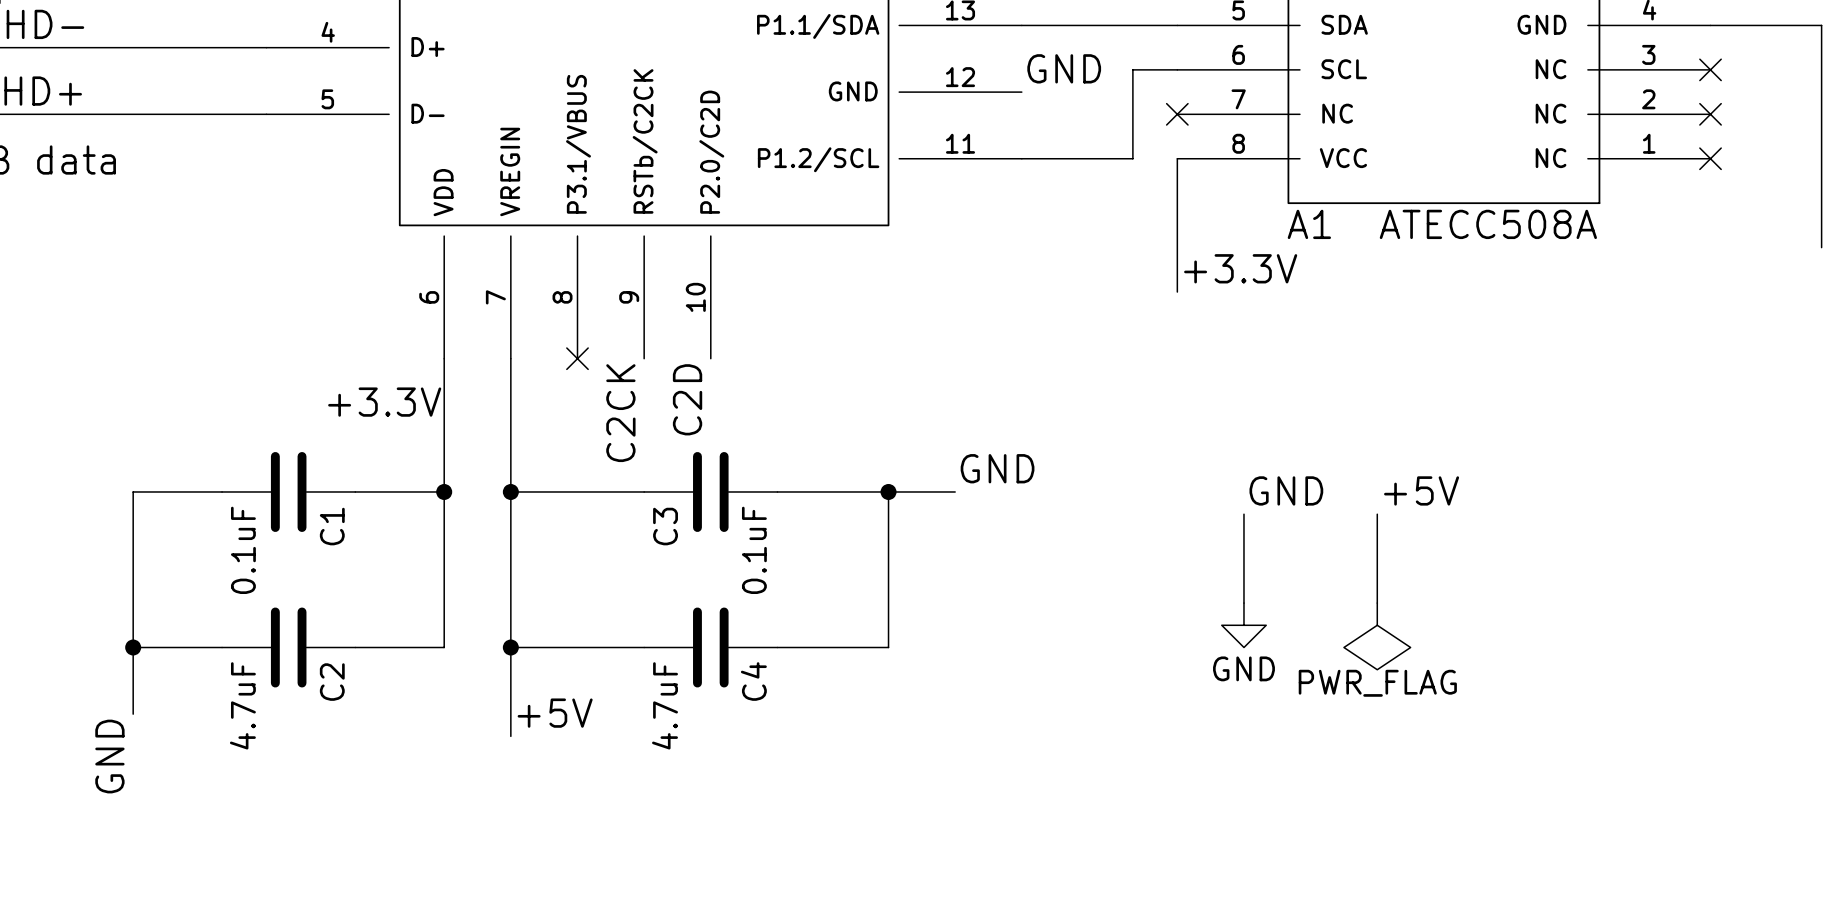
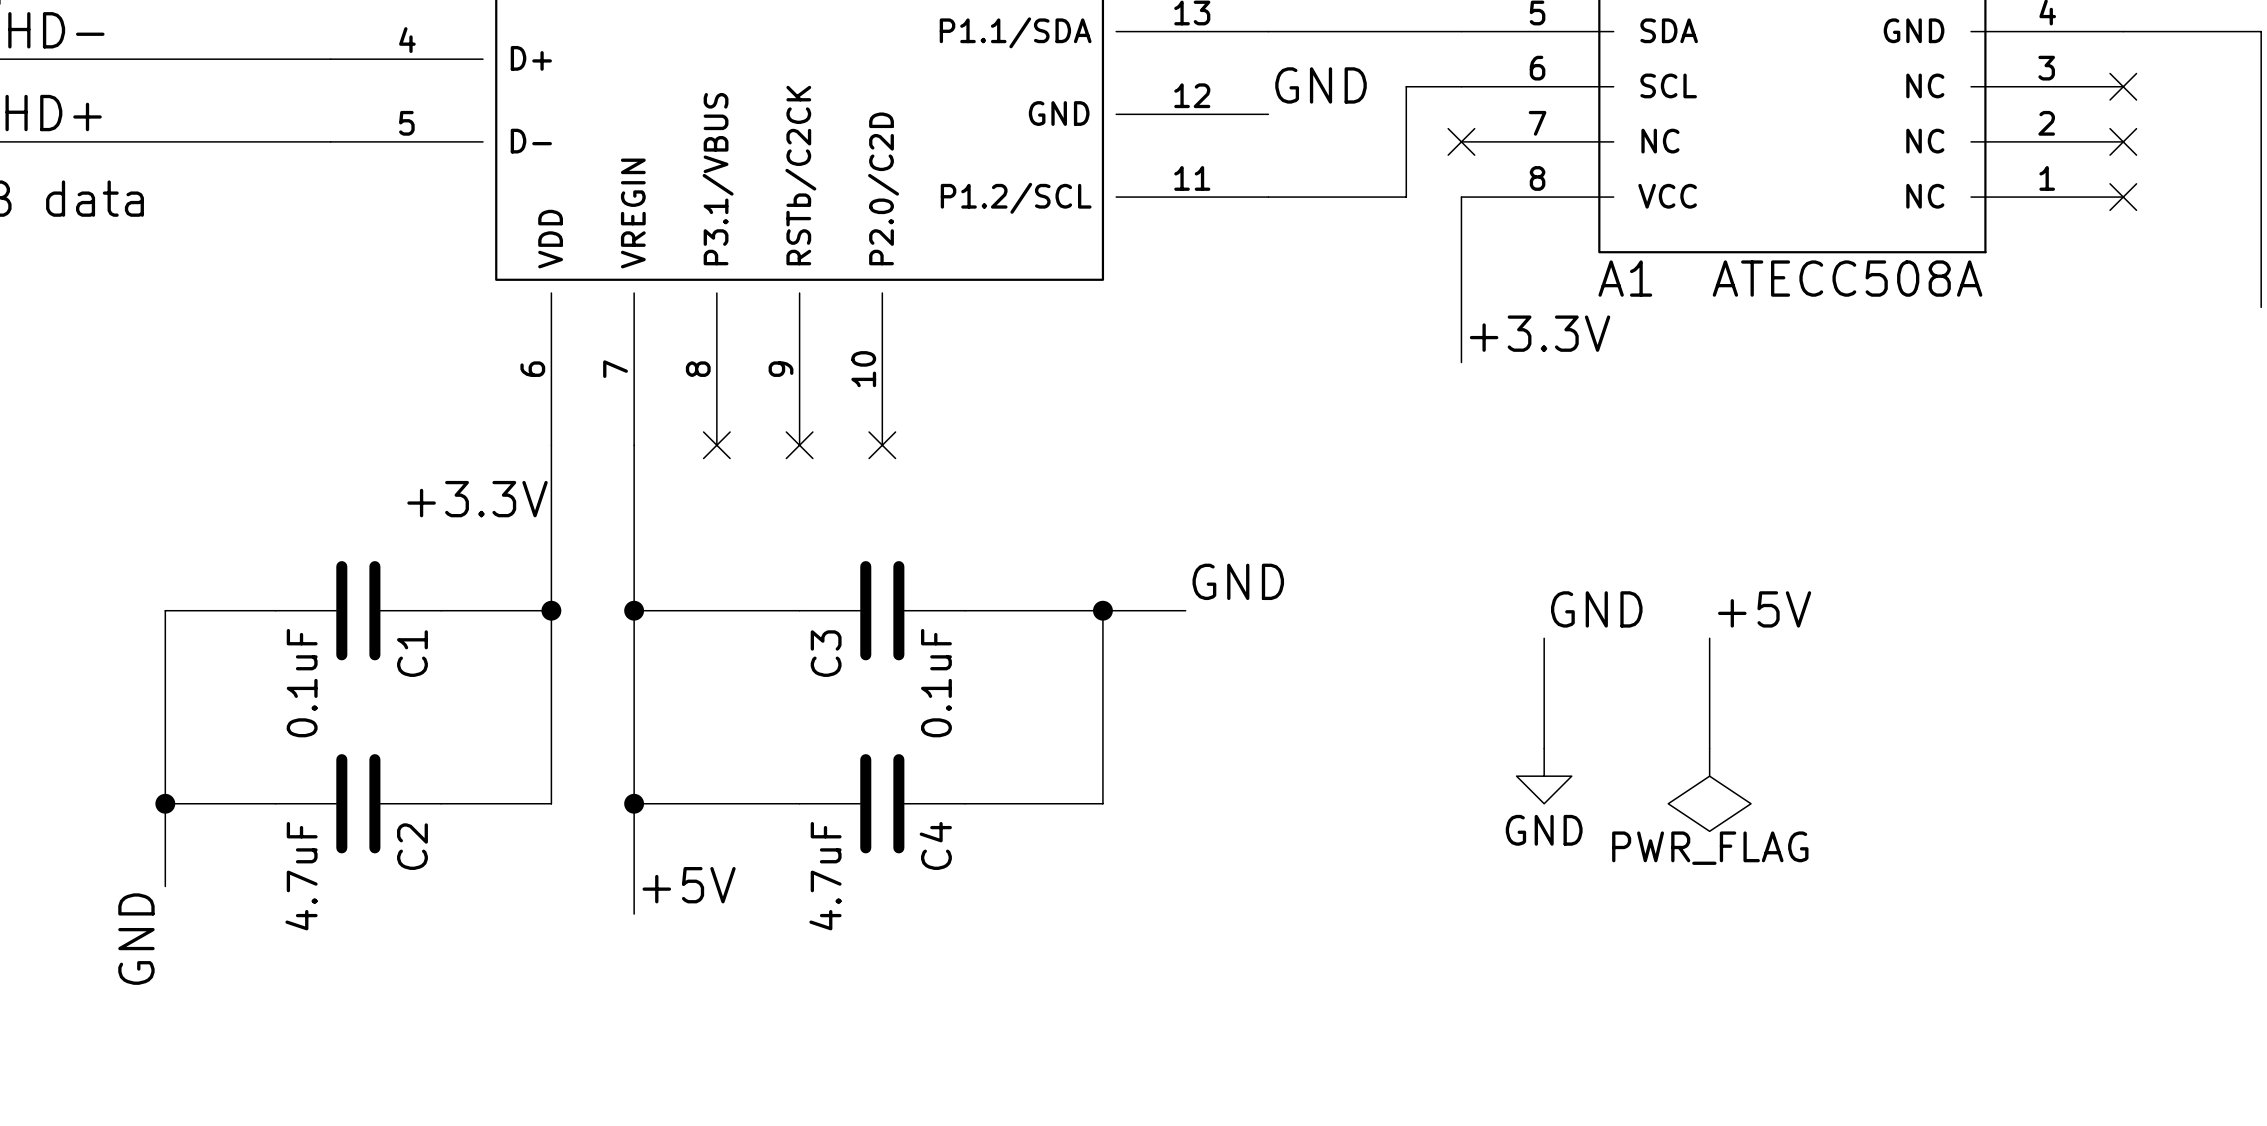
no-connect mark: none -> (799, 445)
no-connect mark: none -> (882, 445)
label: C2D (687, 399) -> none
label: C2CK (620, 413) -> none

